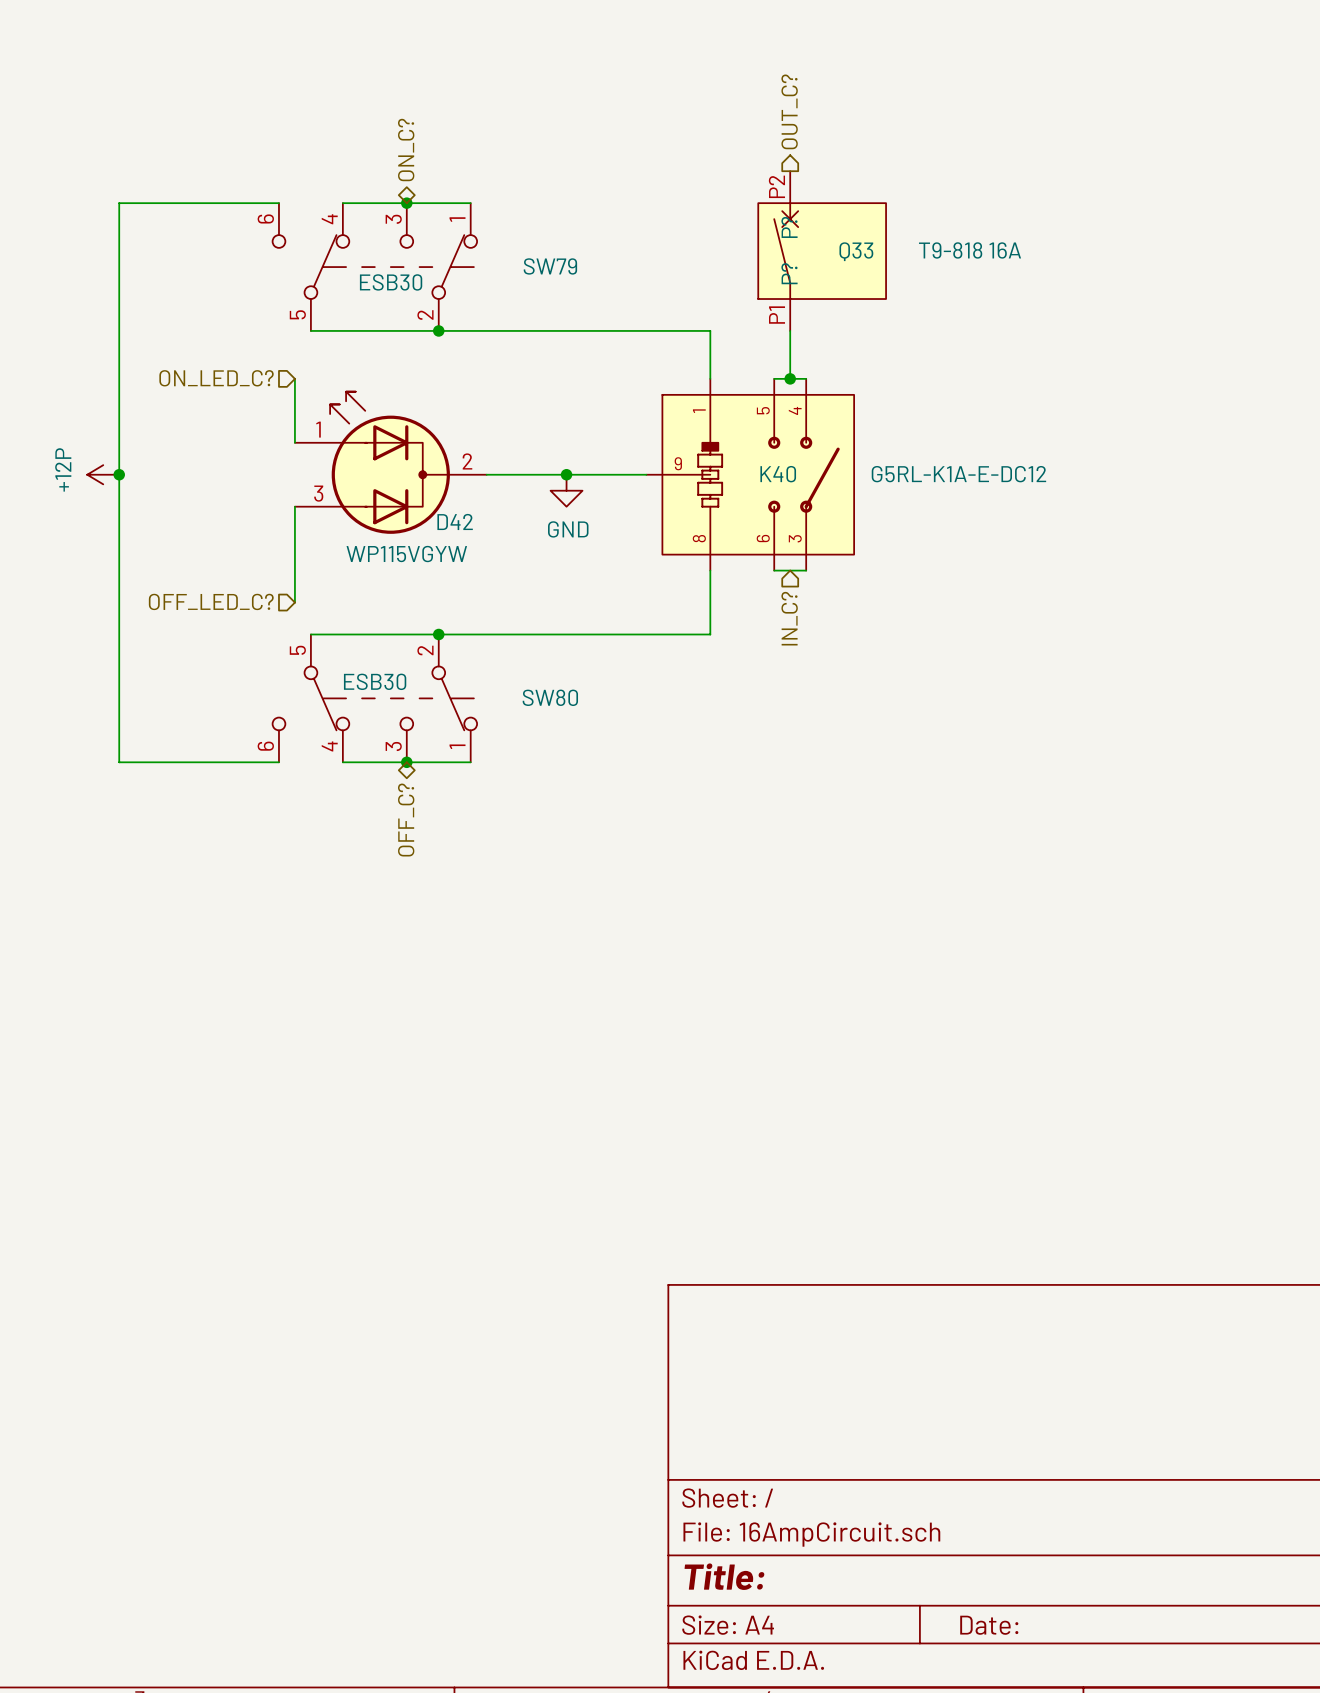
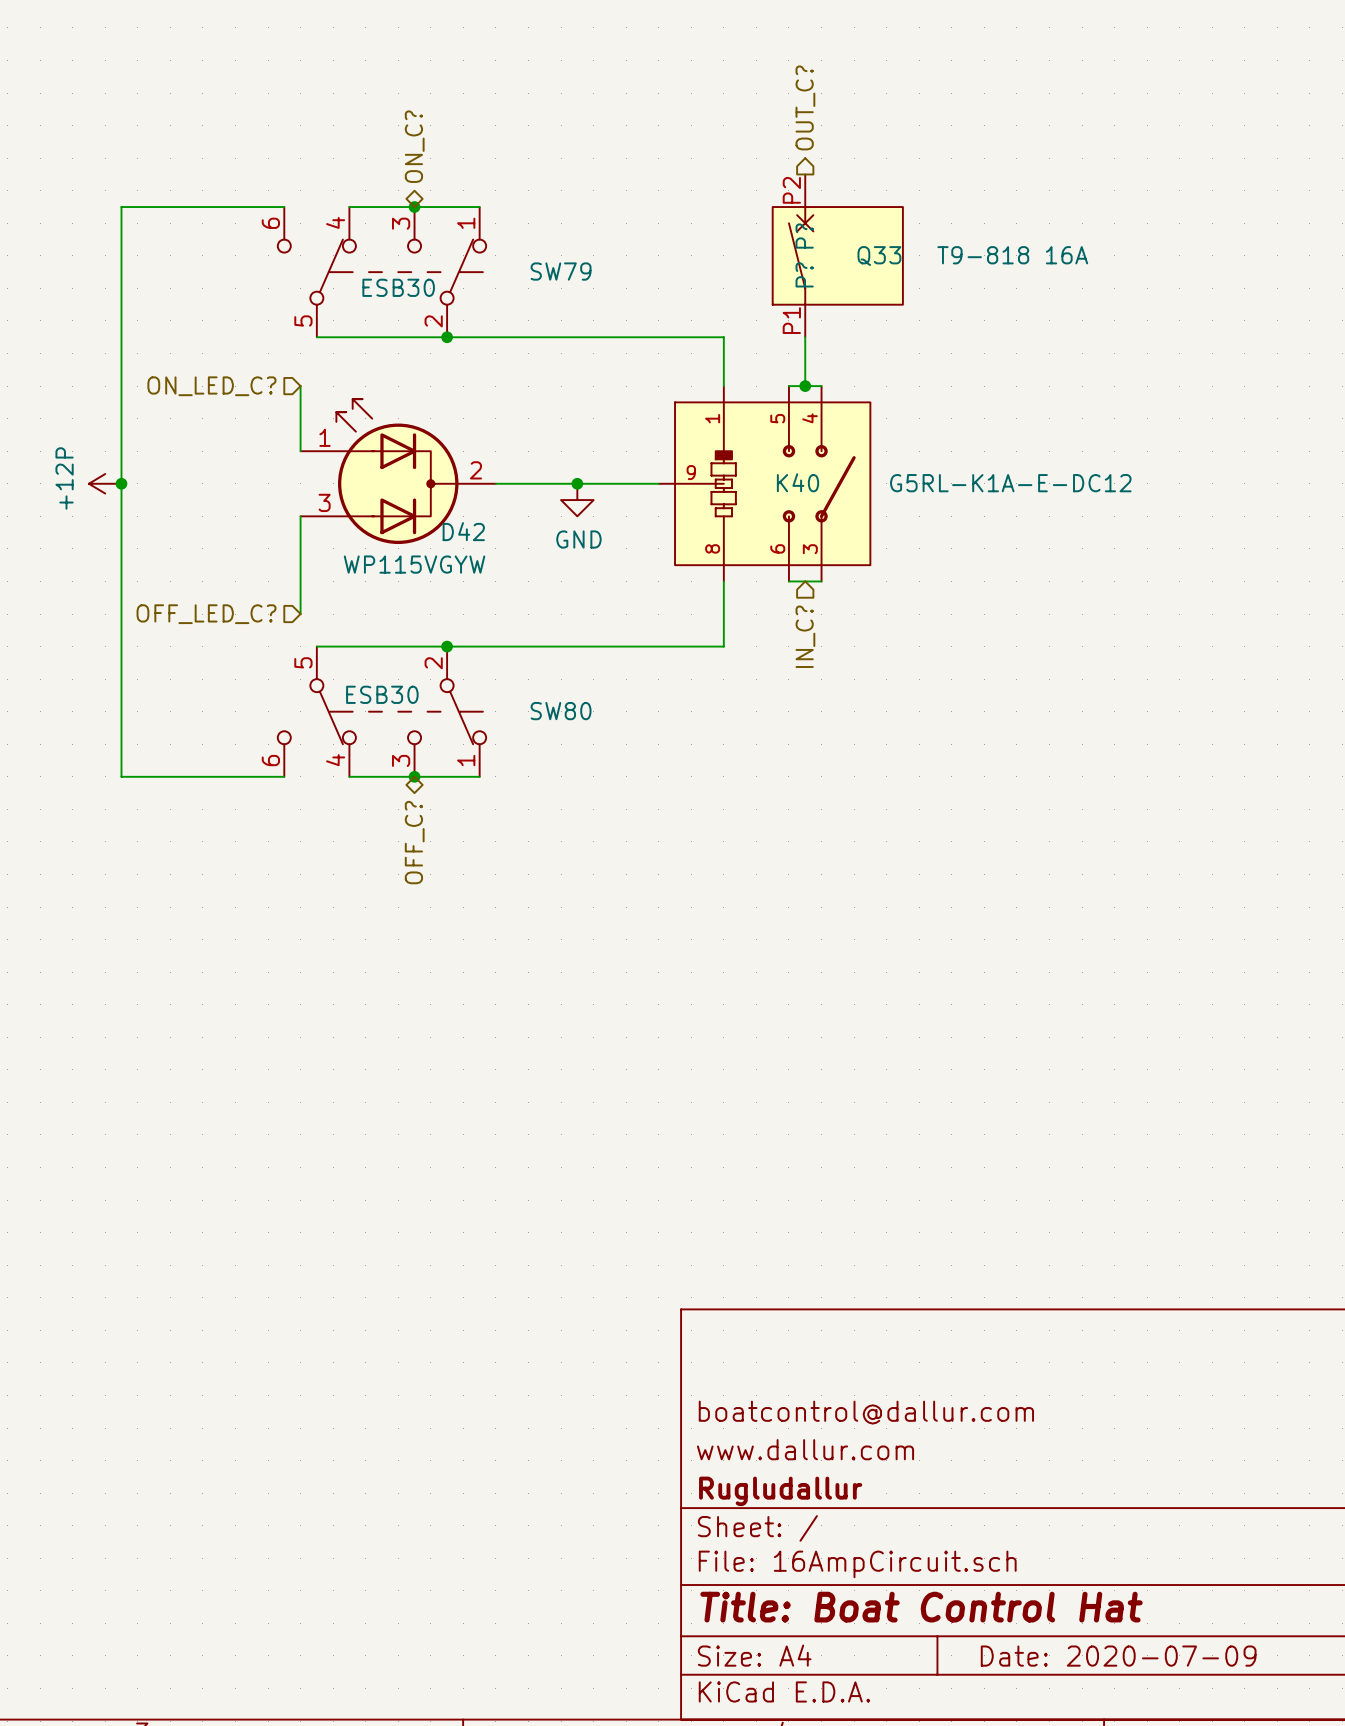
title block: none -> boatcontrol@dallur.com (866, 1412)
title block: none -> www.dallur.com (805, 1449)
title block: none -> Rugludallur (780, 1491)
title block: Title: (724, 1576) -> Title: Boat Control Hat (921, 1607)
title block: Date: (989, 1625) -> Date: 2020-07-09 (1118, 1656)

